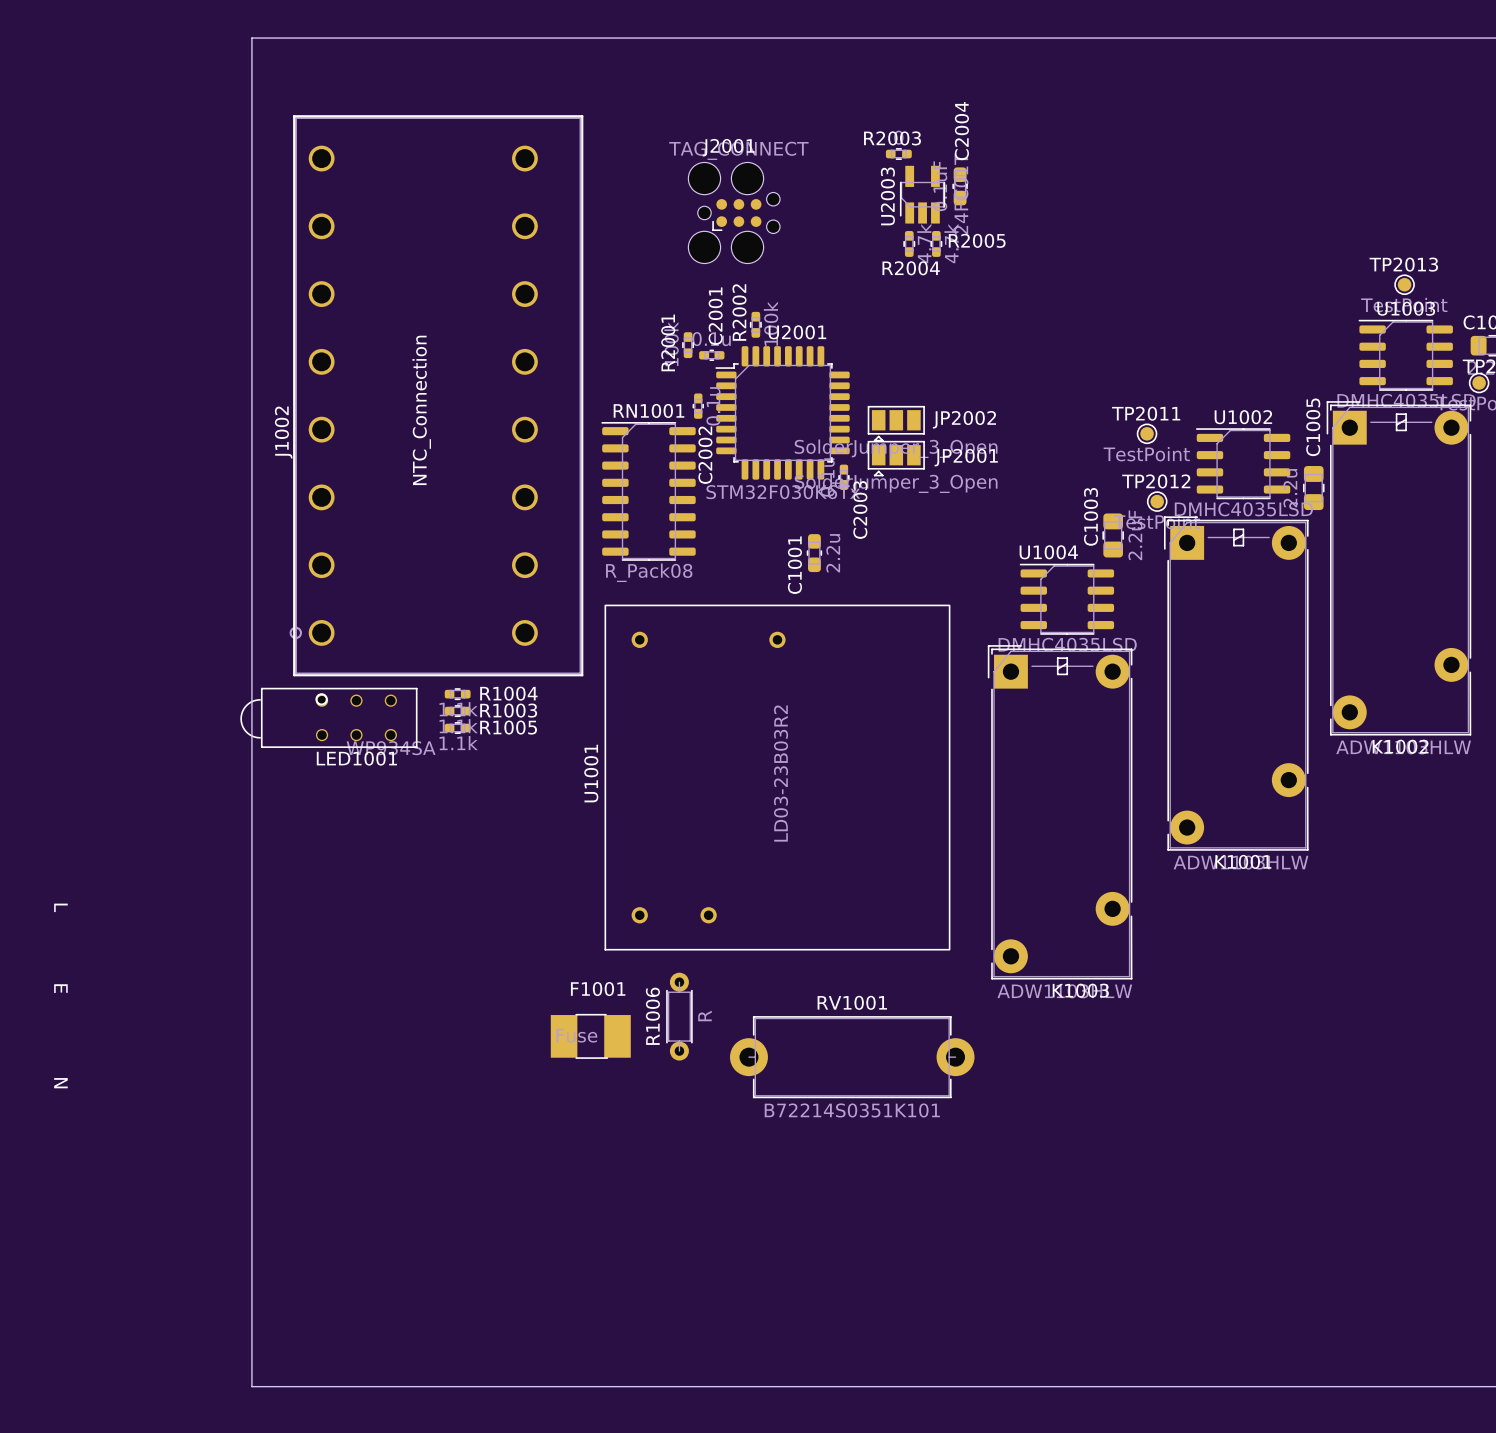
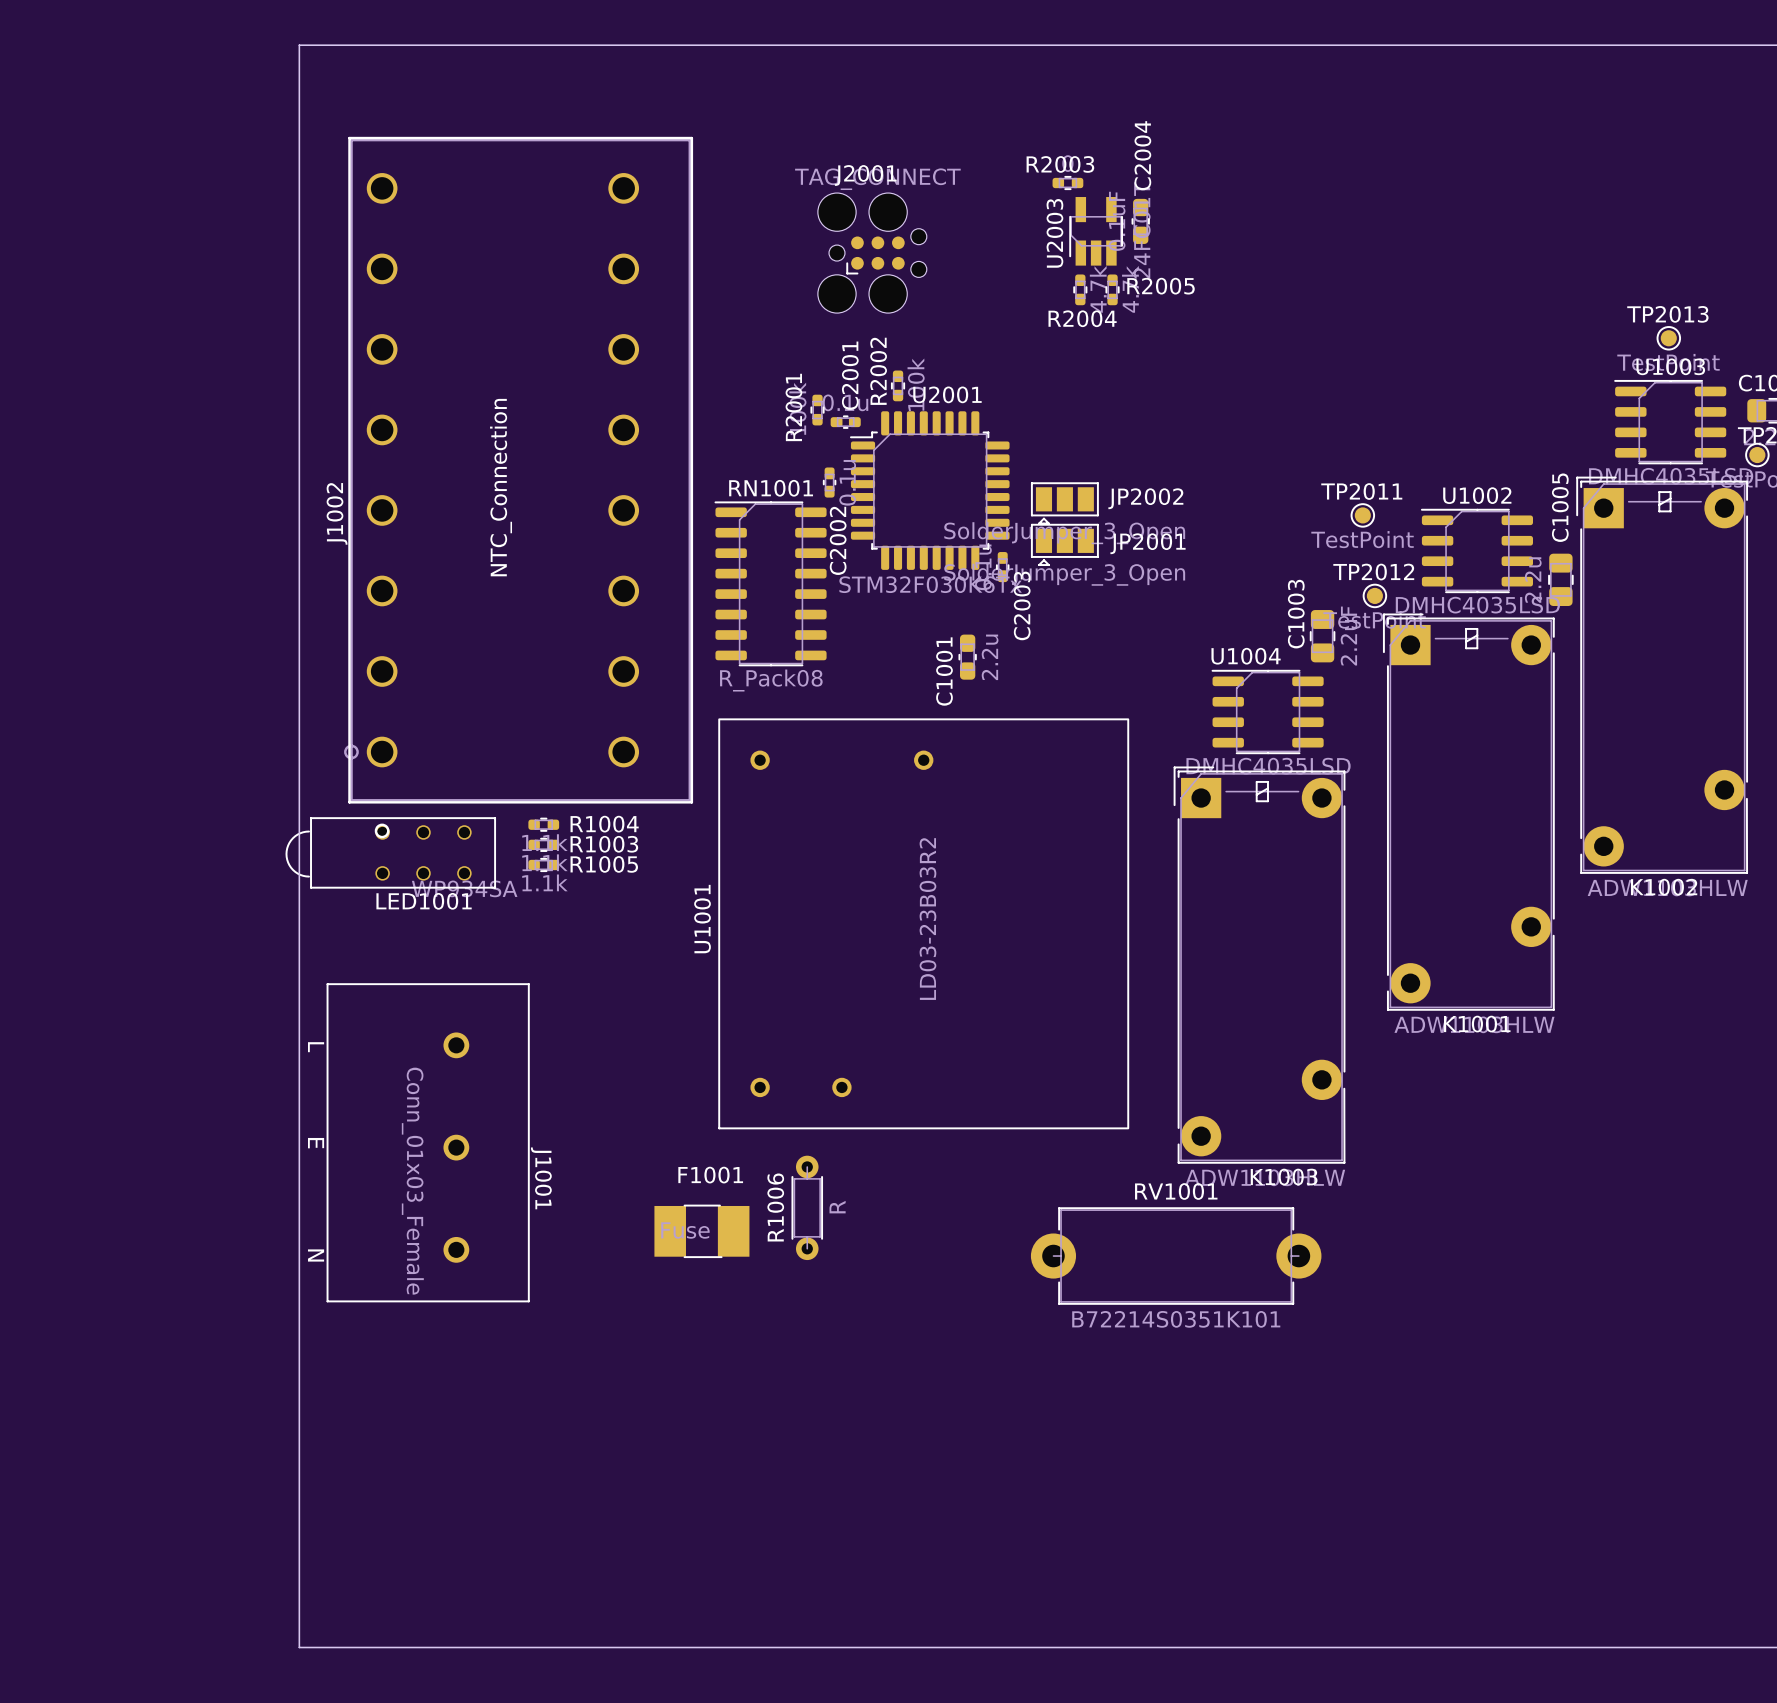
text position: L (60, 907) -> L (316, 1047)
J1001: none -> Conn_01x03_Female (428, 1142)
text position: E (60, 988) -> E (316, 1143)
RV1001 position: (852, 1057) -> (1176, 1256)
text position: N (60, 1083) -> N (316, 1255)

